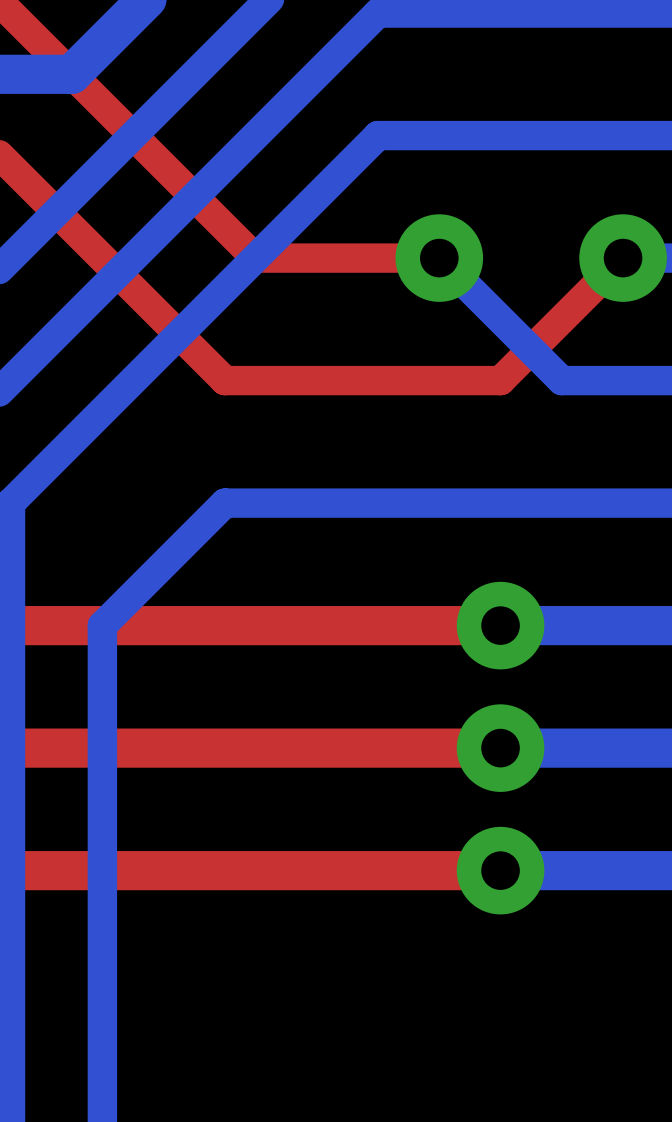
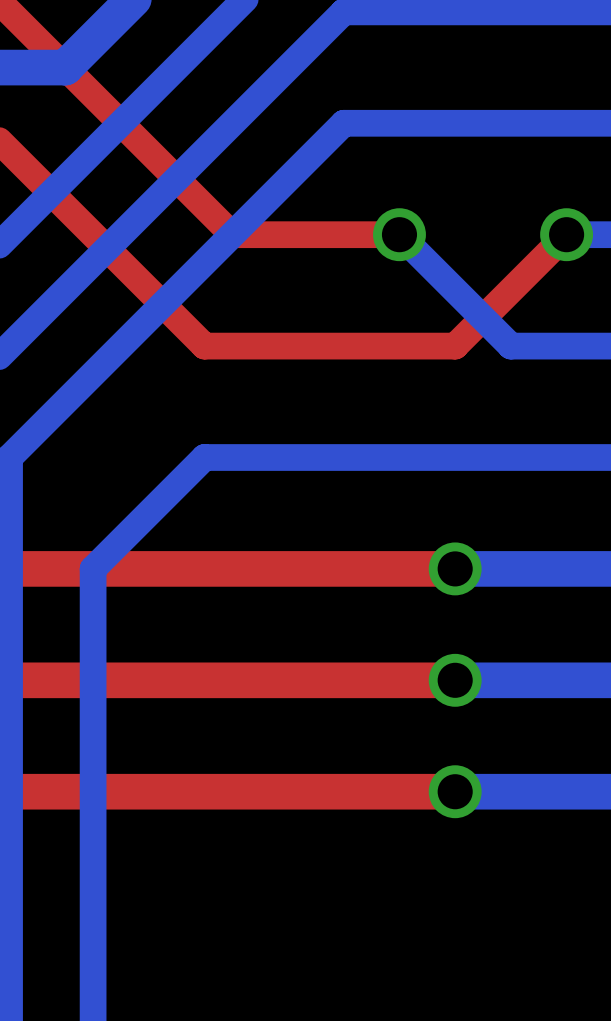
via size: [395, 214, 484, 302] -> [373, 208, 426, 262]
via size: [579, 214, 667, 302] -> [540, 208, 594, 262]
via size: [456, 581, 545, 670] -> [428, 542, 482, 596]
via size: [456, 704, 545, 792] -> [428, 653, 482, 707]
via size: [456, 826, 545, 915] -> [428, 765, 482, 819]

